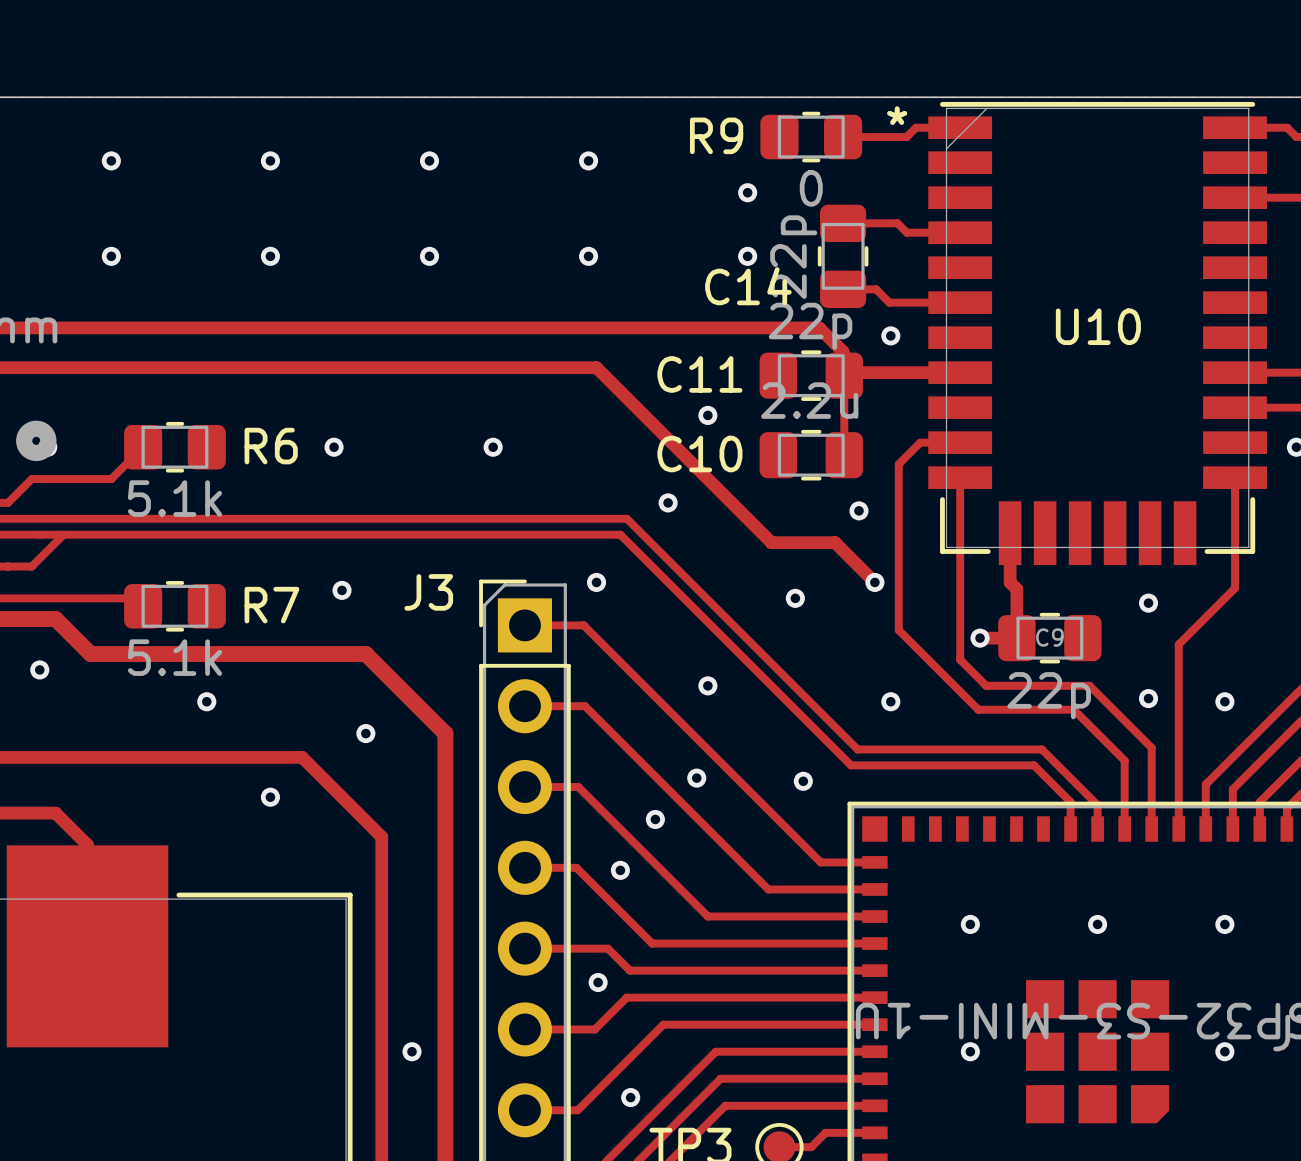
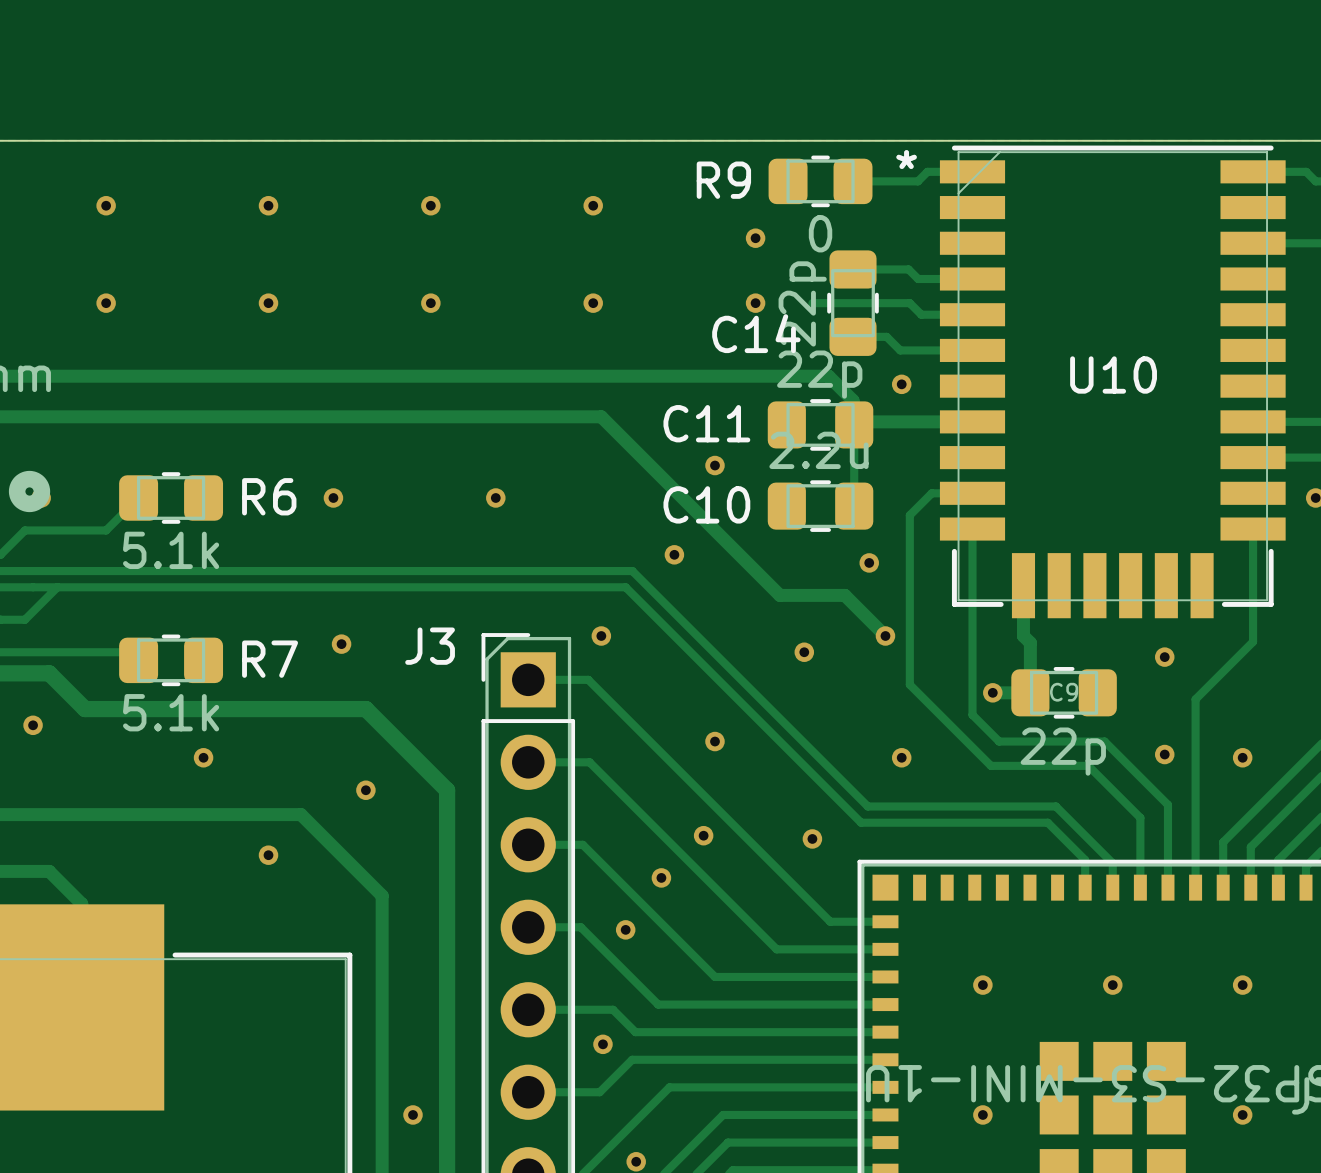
U10 footprint: [928, 101, 1267, 566] -> [939, 145, 1286, 619]
track: none -> (812, 303) (909, 303) (921, 314) (972, 314)

